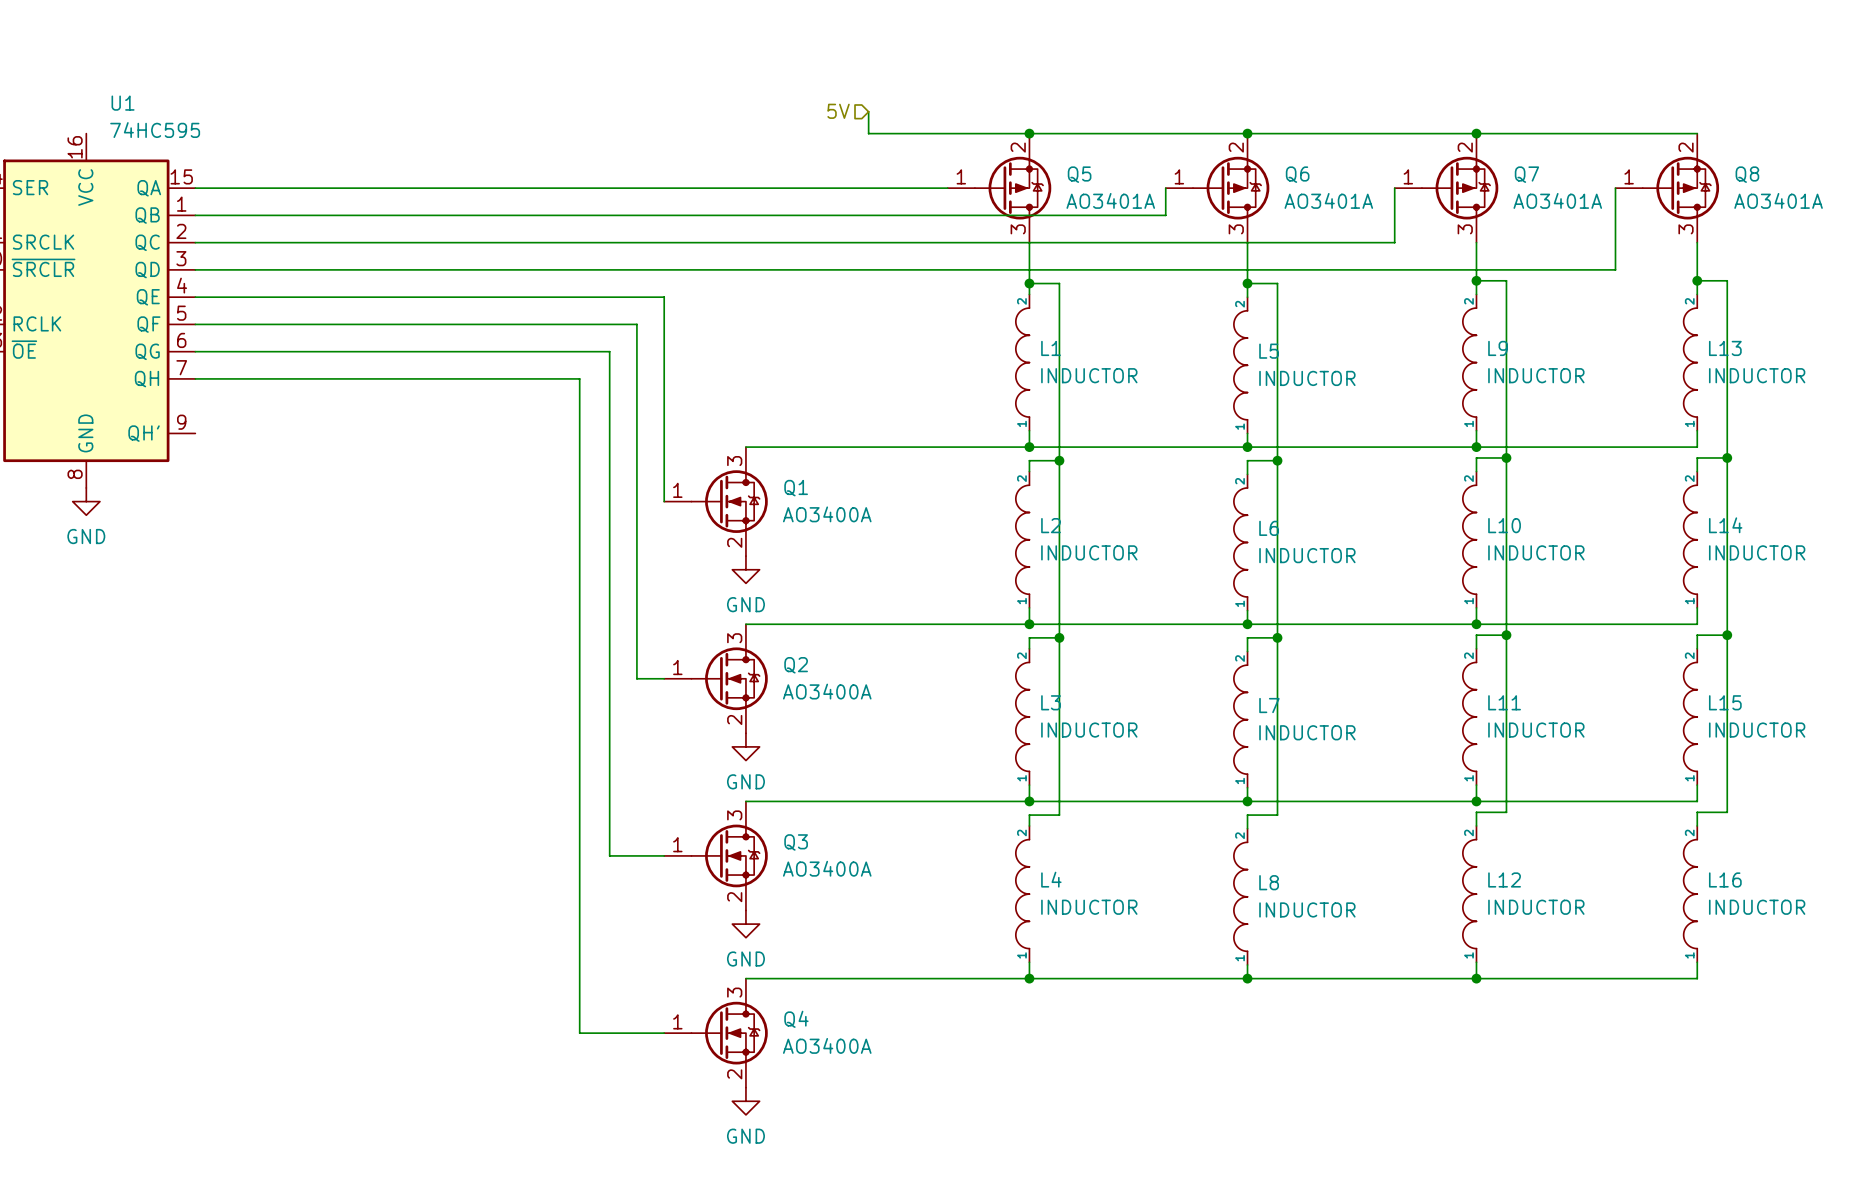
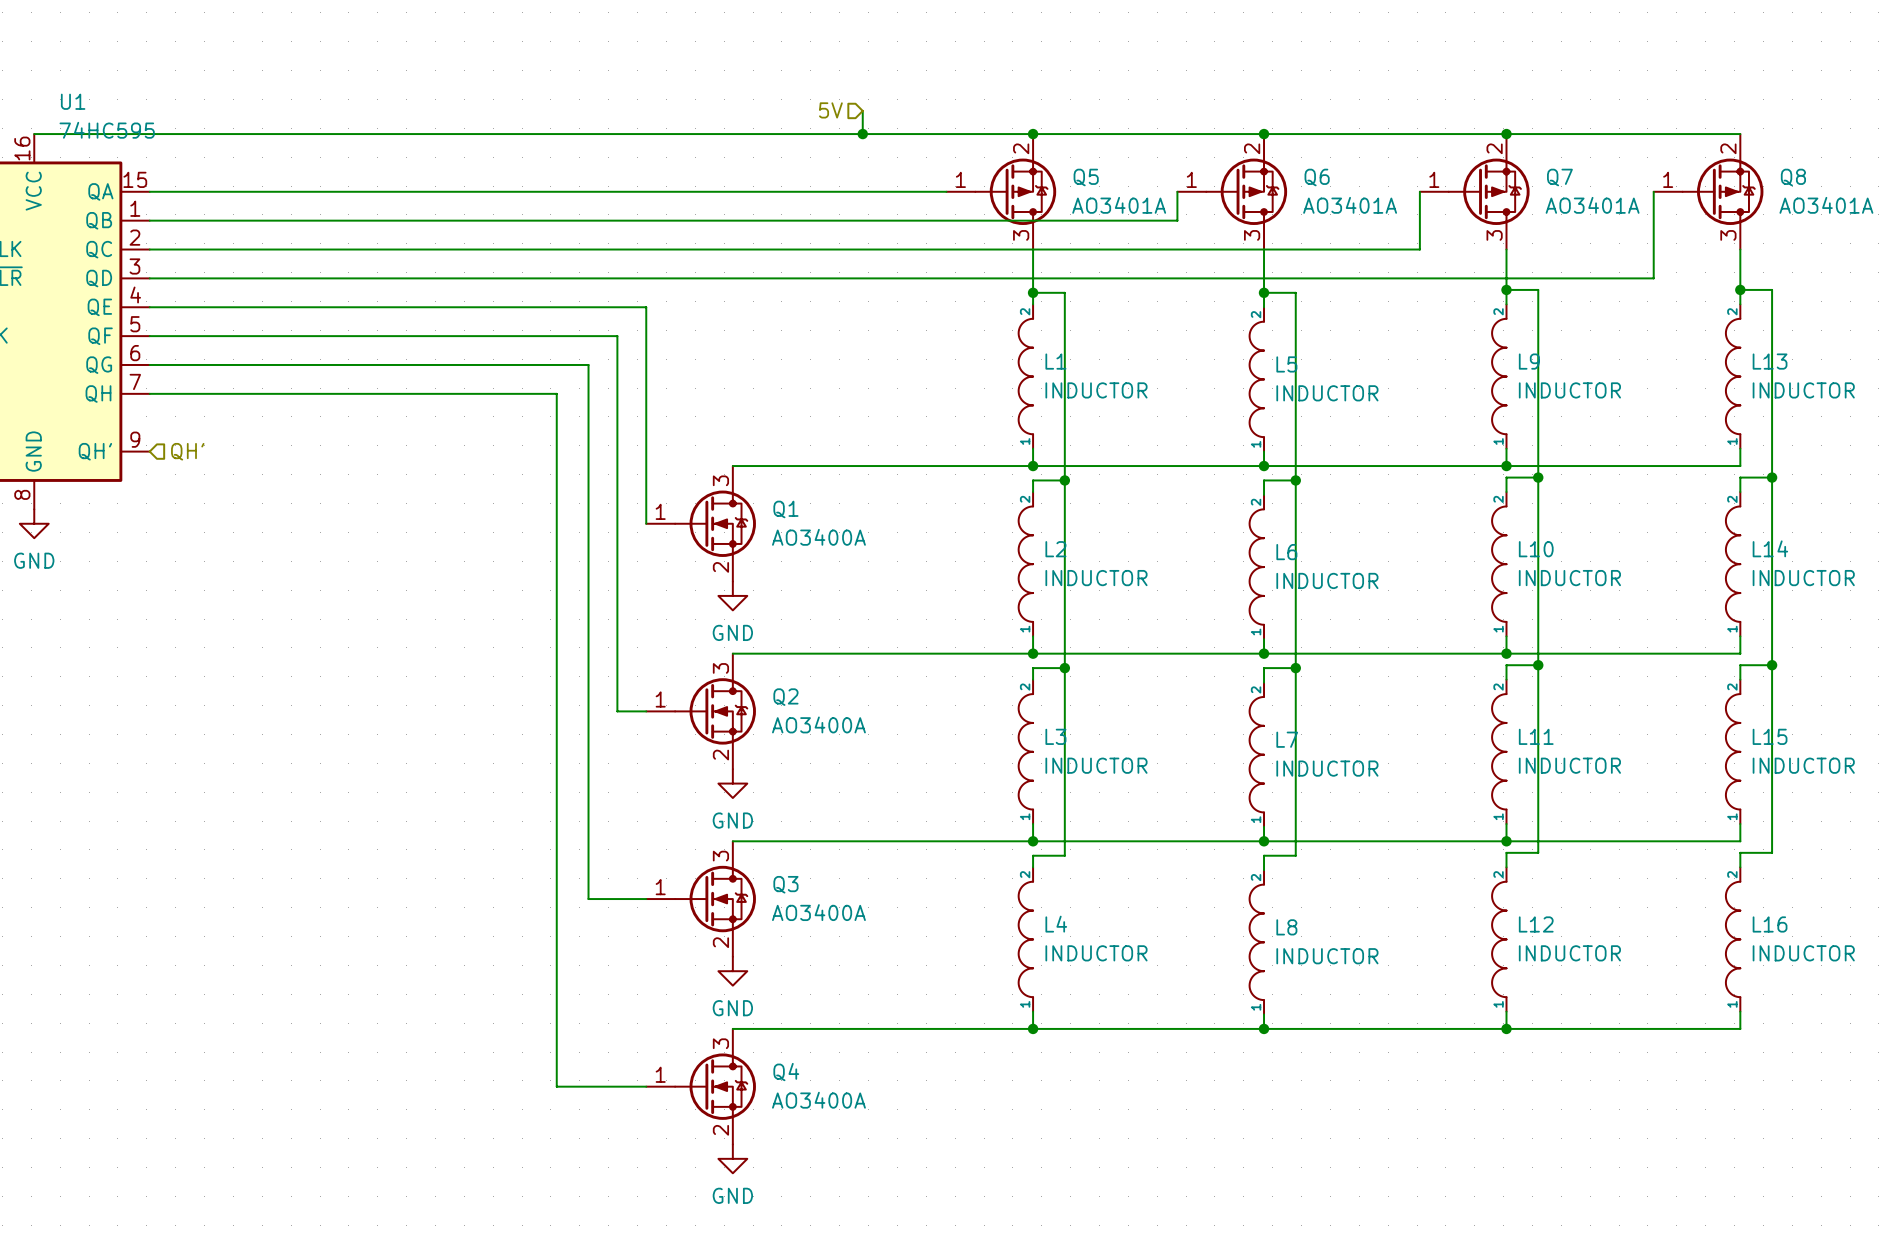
wire: none -> (34, 134) (862, 134)
junction: none -> (862, 134)
hierarchical label: none -> QH' (187, 451)

